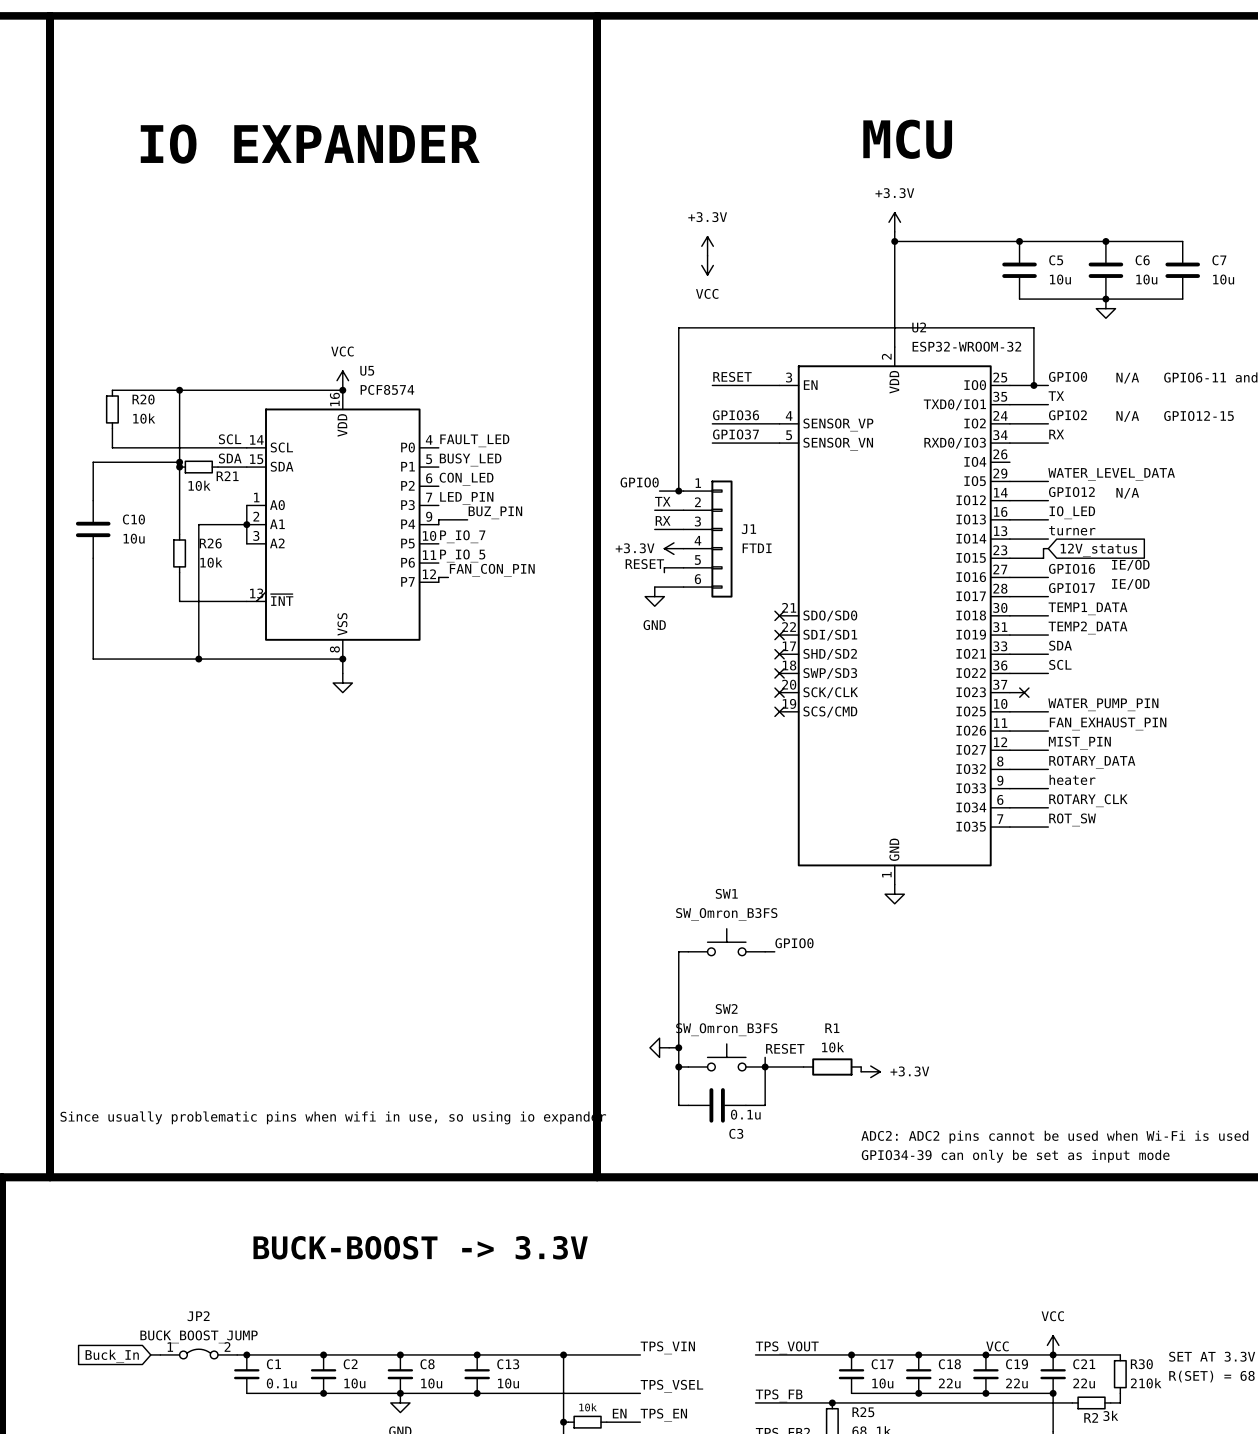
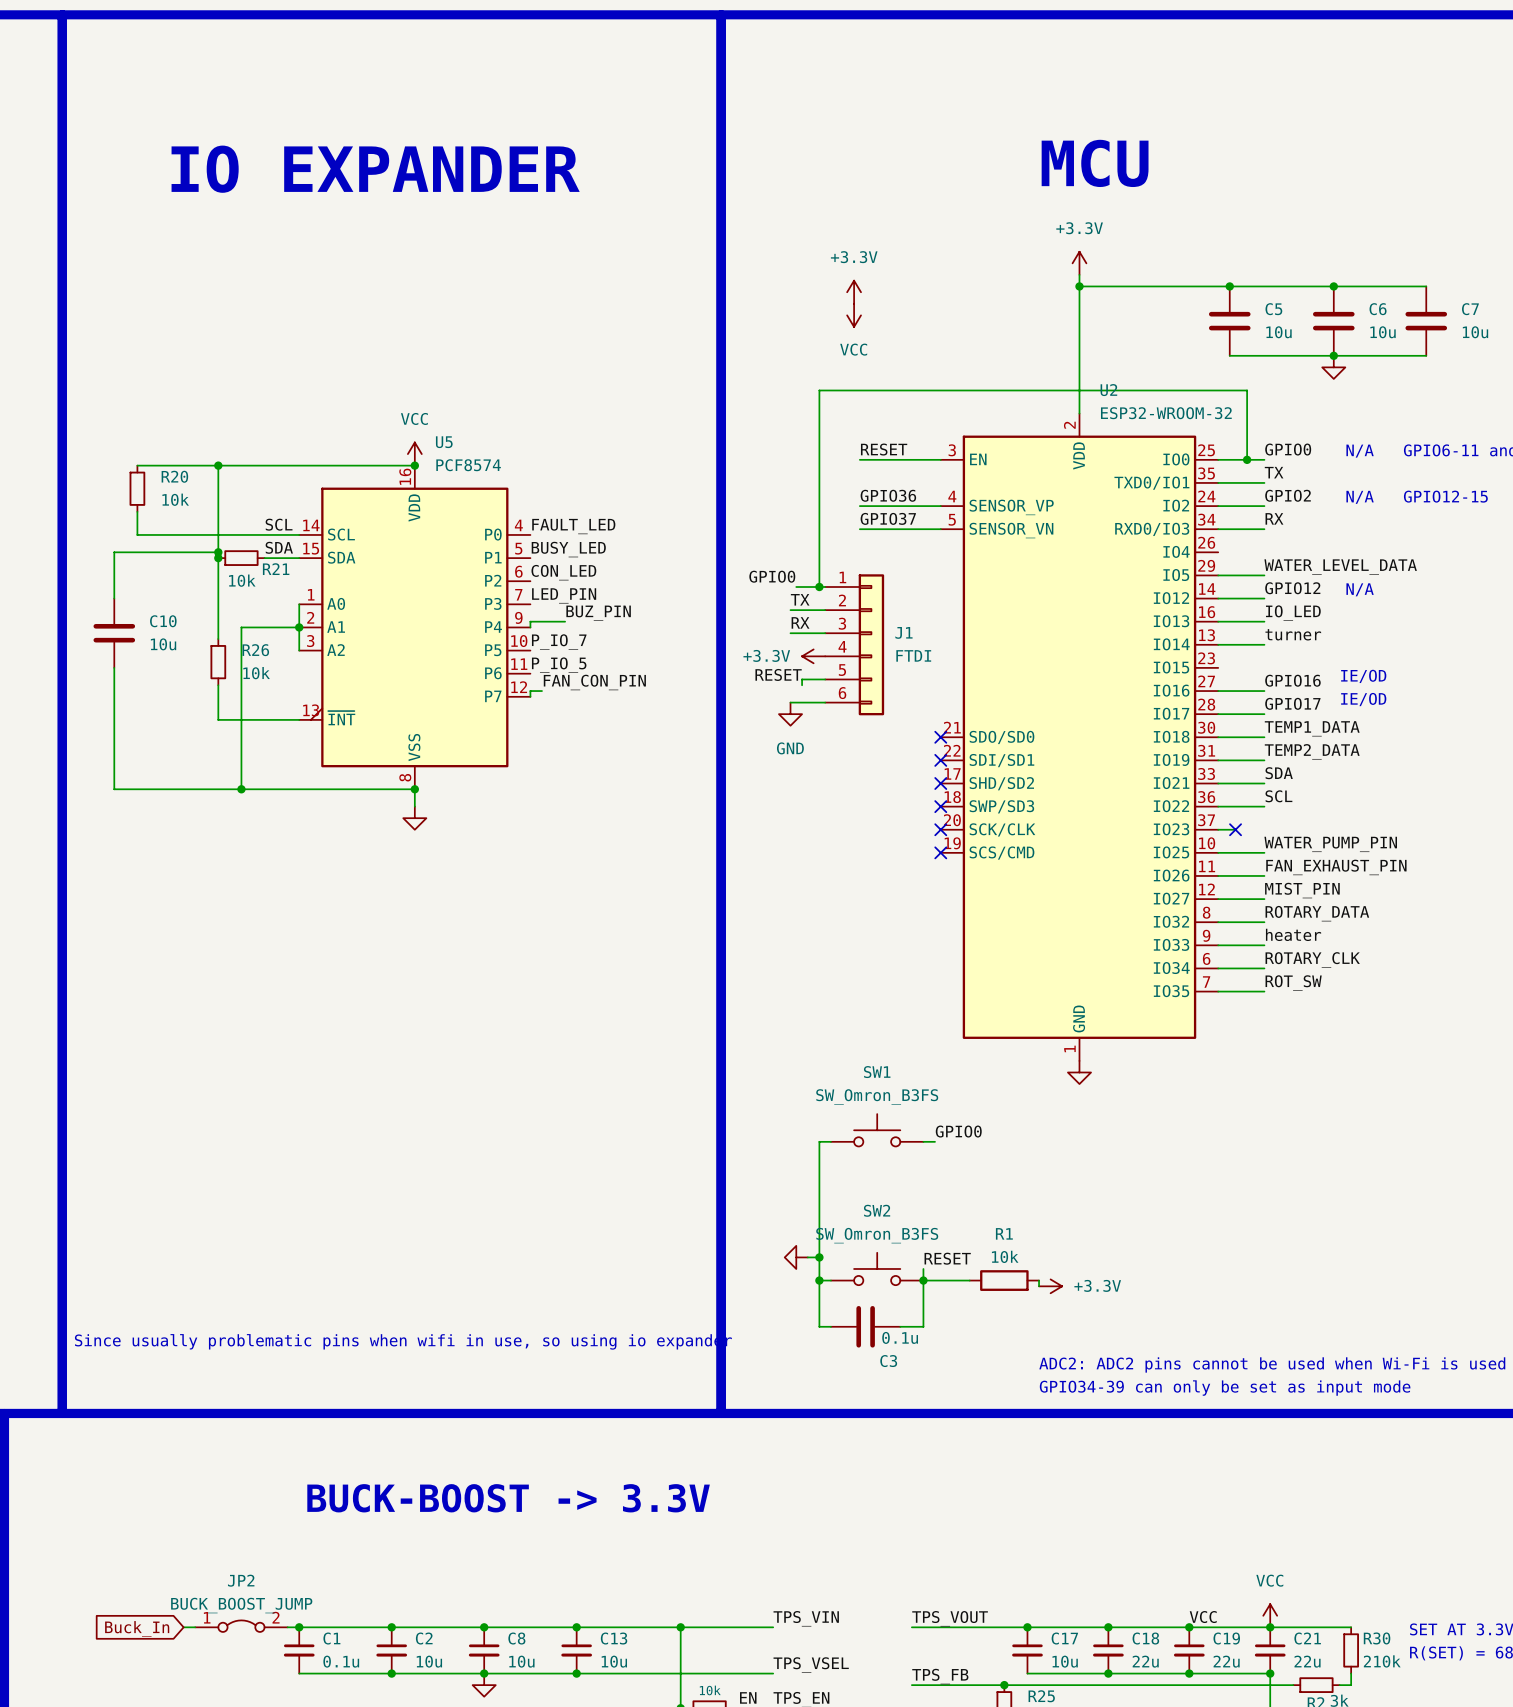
wire: (1048, 548) (1043, 548) (1043, 558) (1009, 558) -> none
global label: 12V_status (1098, 550) -> none

